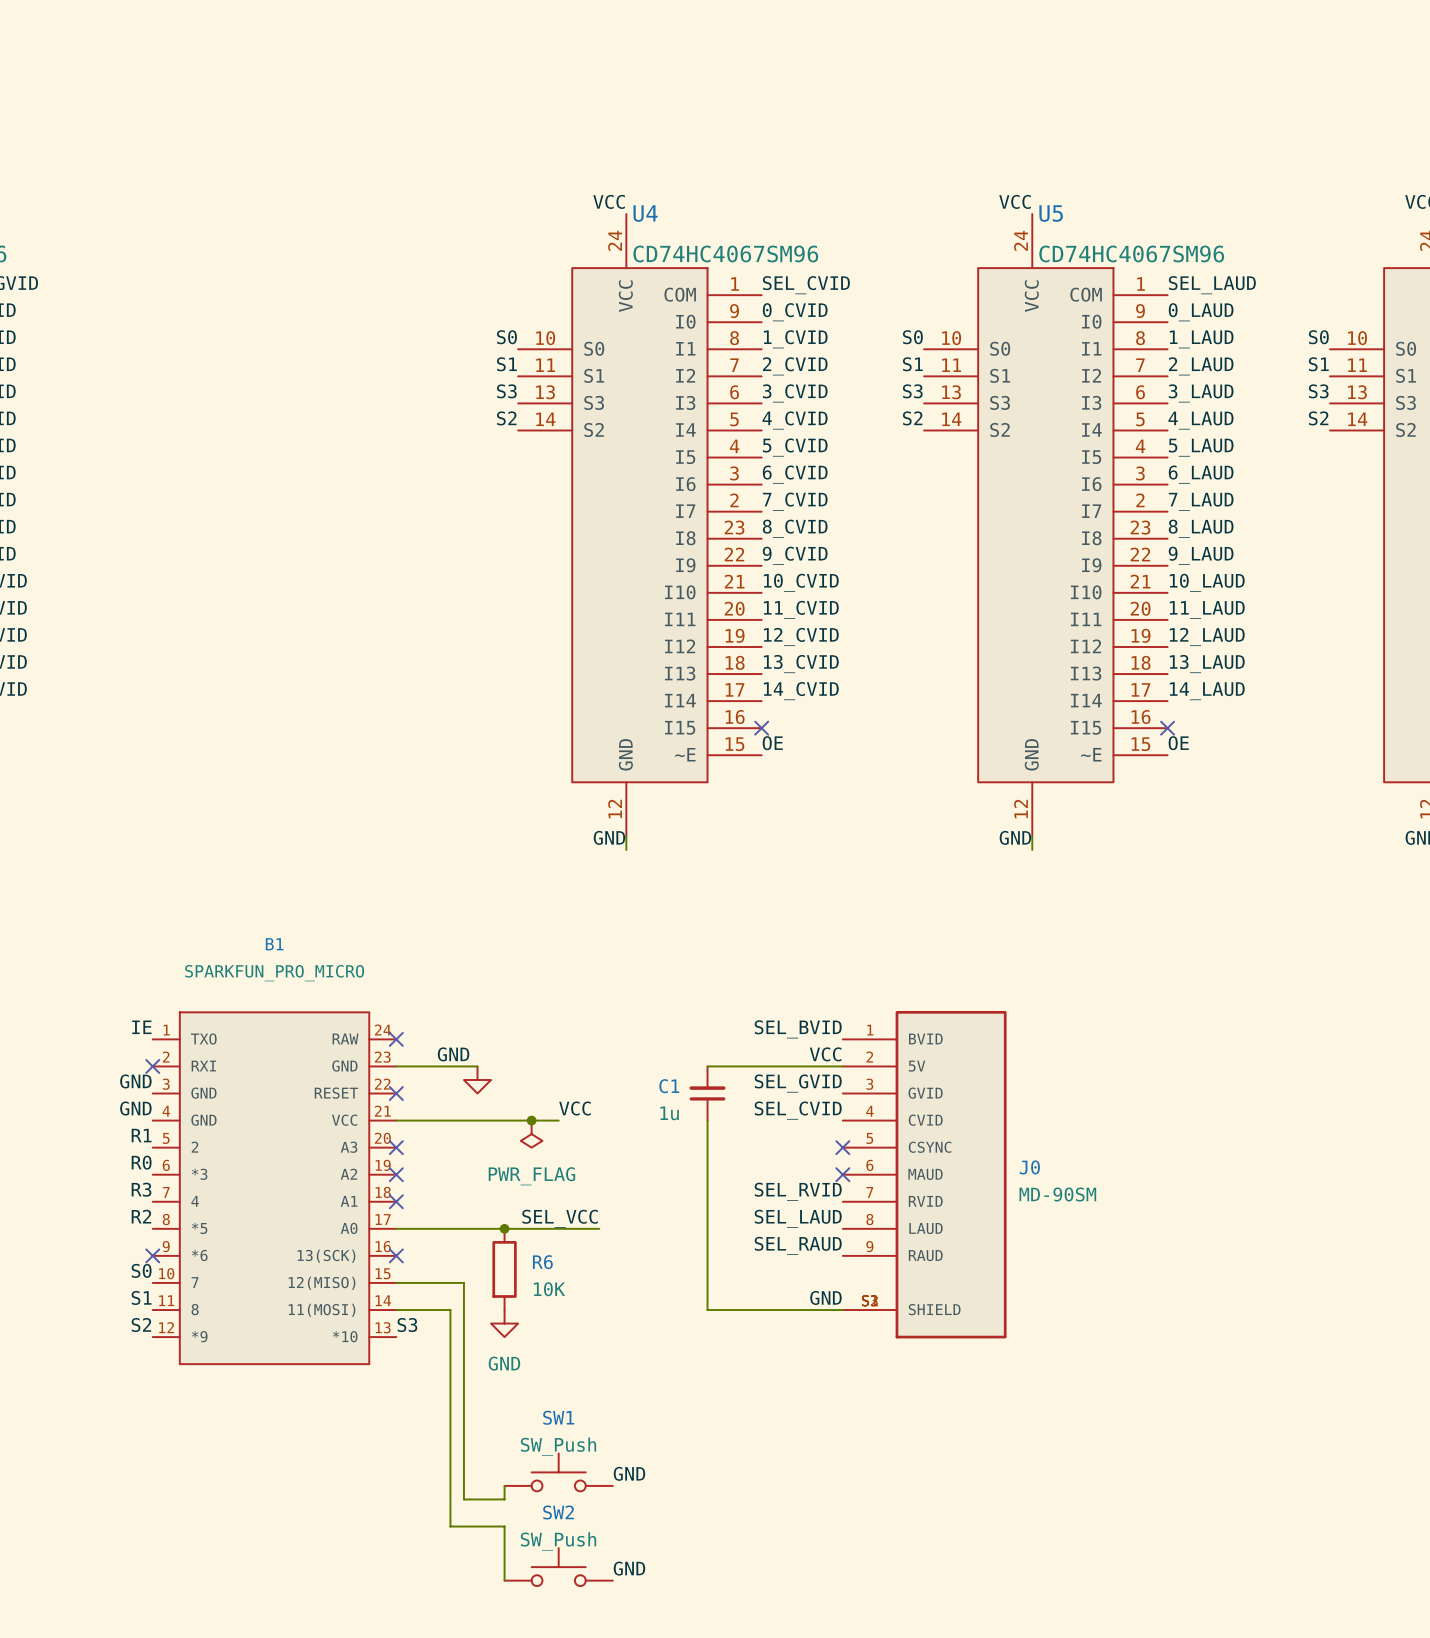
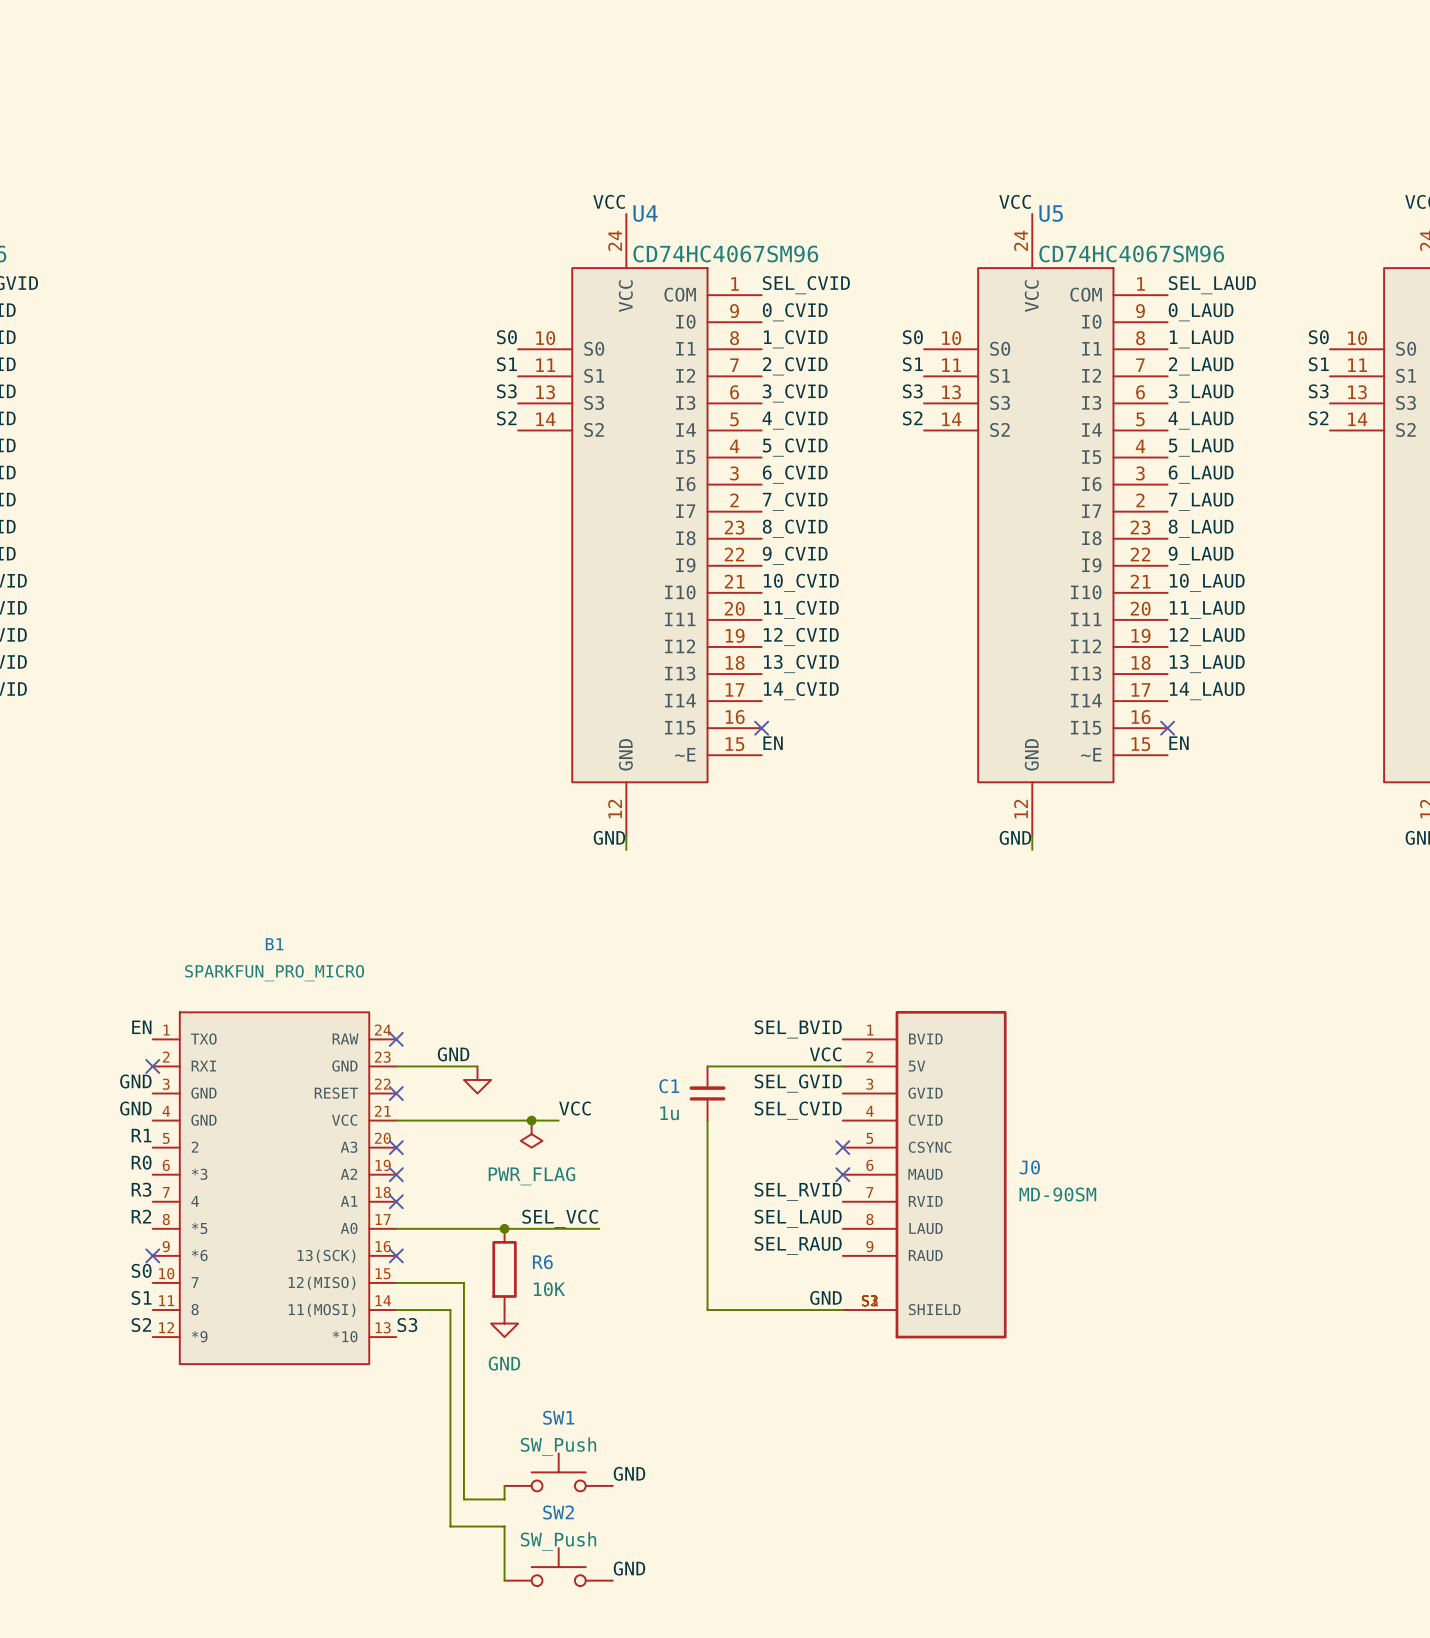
label: OE (772, 743) -> EN (773, 743)
label: OE (1178, 743) -> EN (1179, 743)
label: IE (141, 1027) -> EN (141, 1027)

